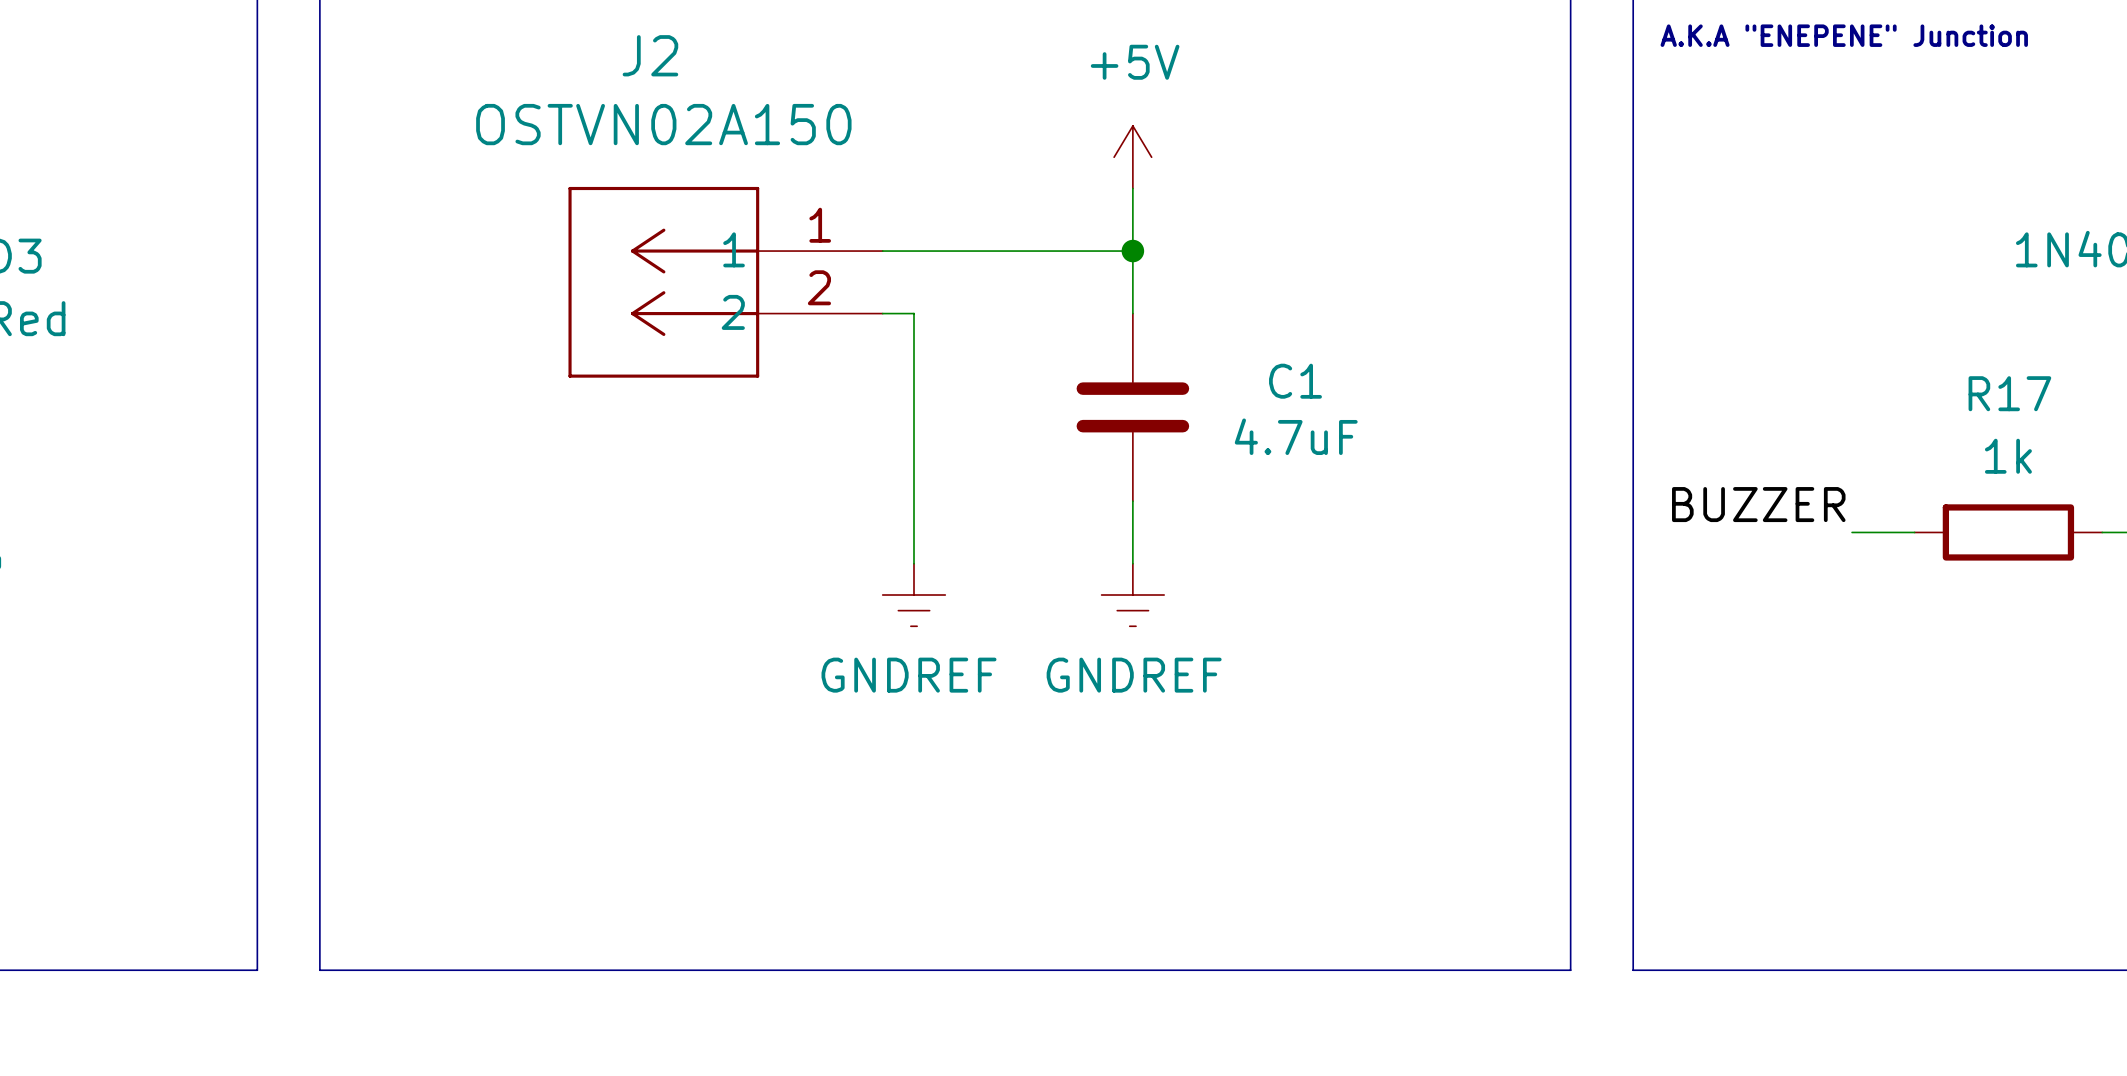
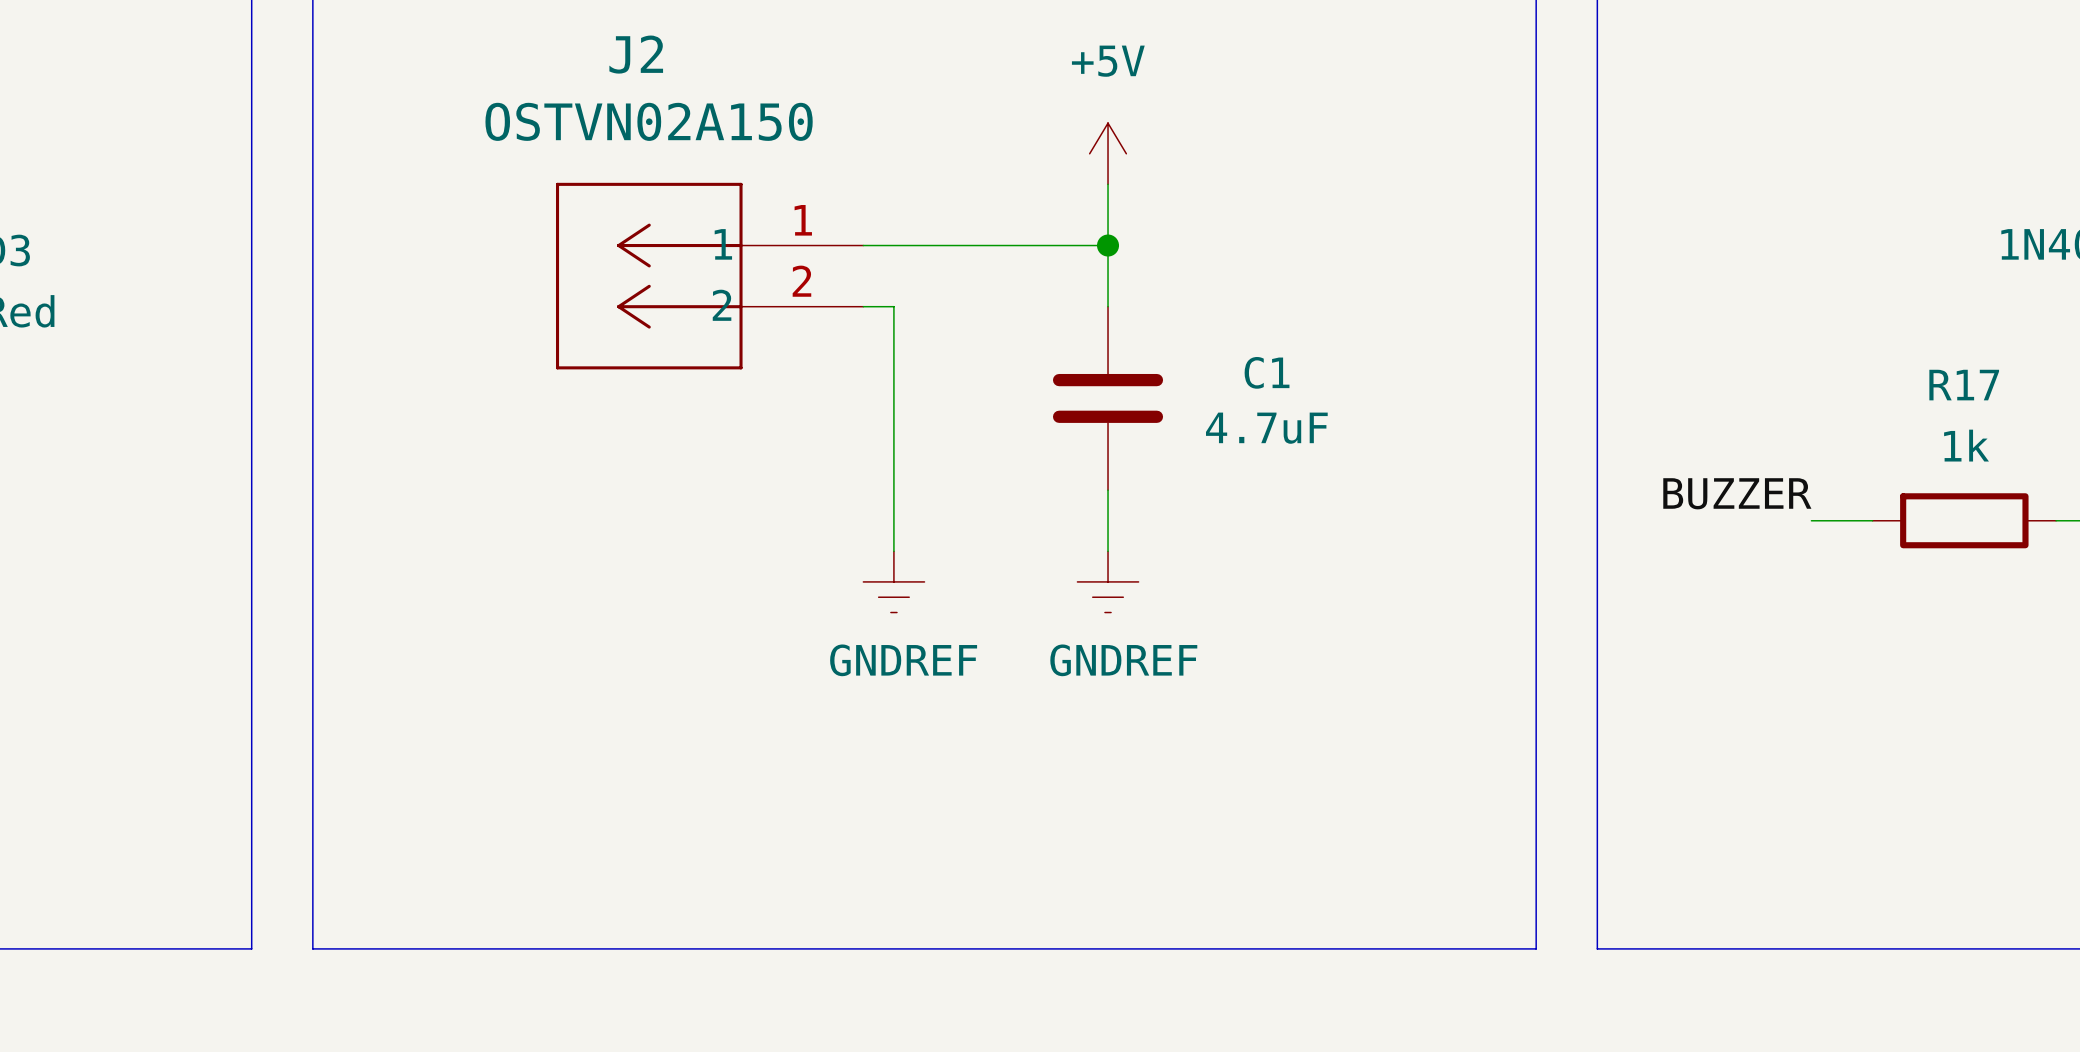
text: A.K.A "ENEPENE" Junction (1844, 35) -> none

